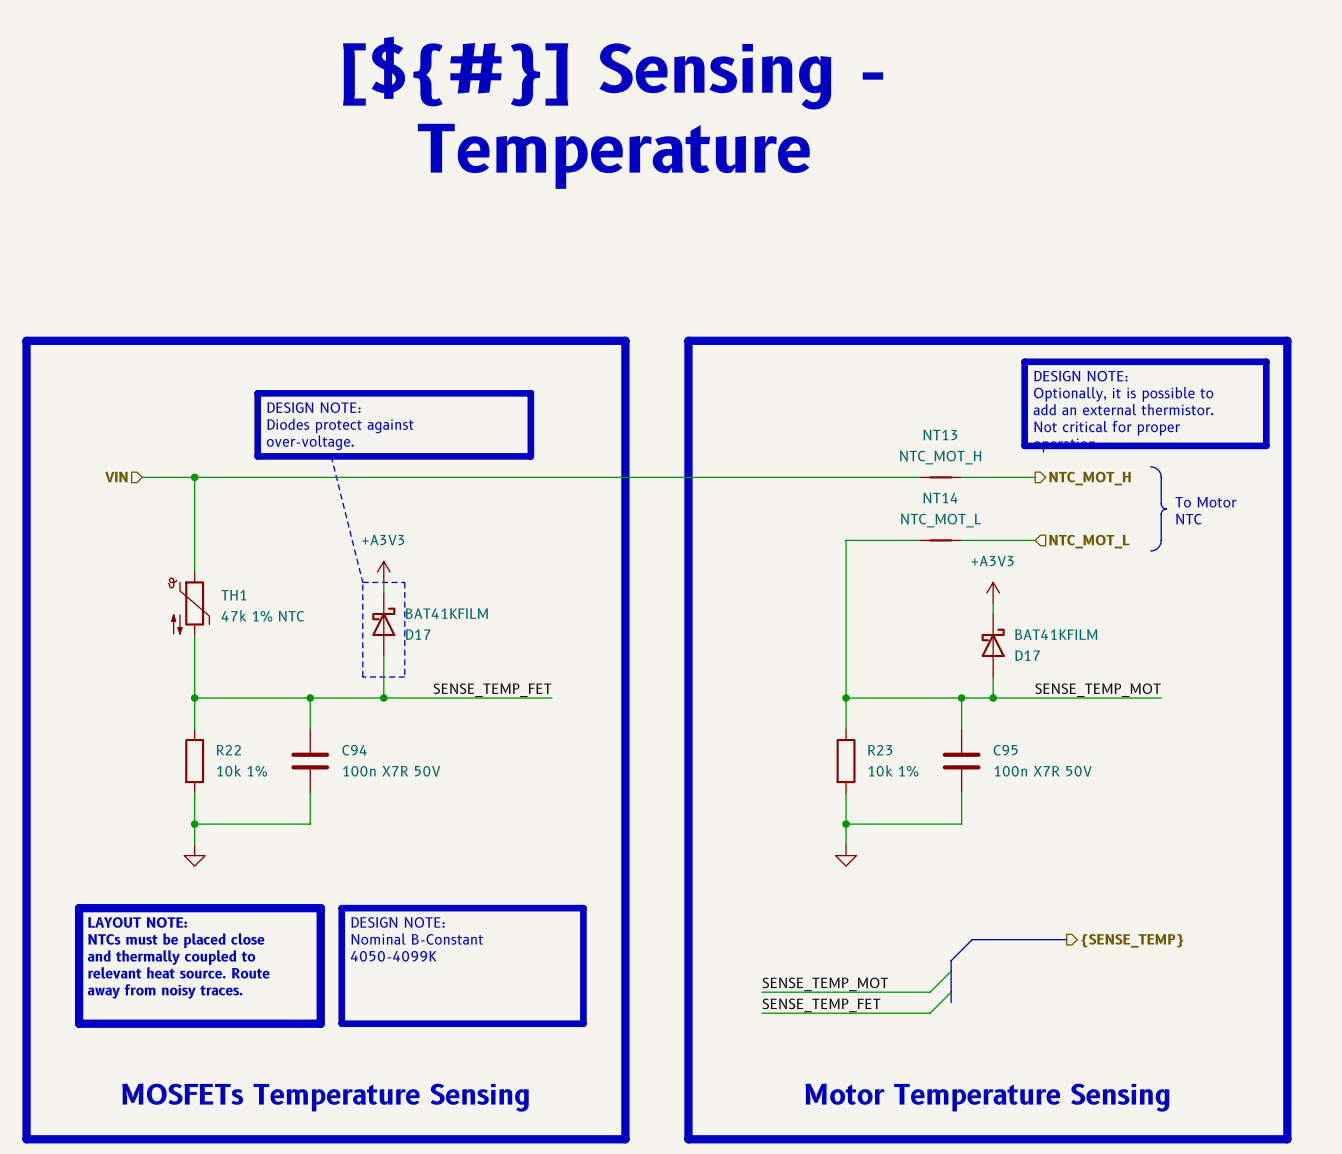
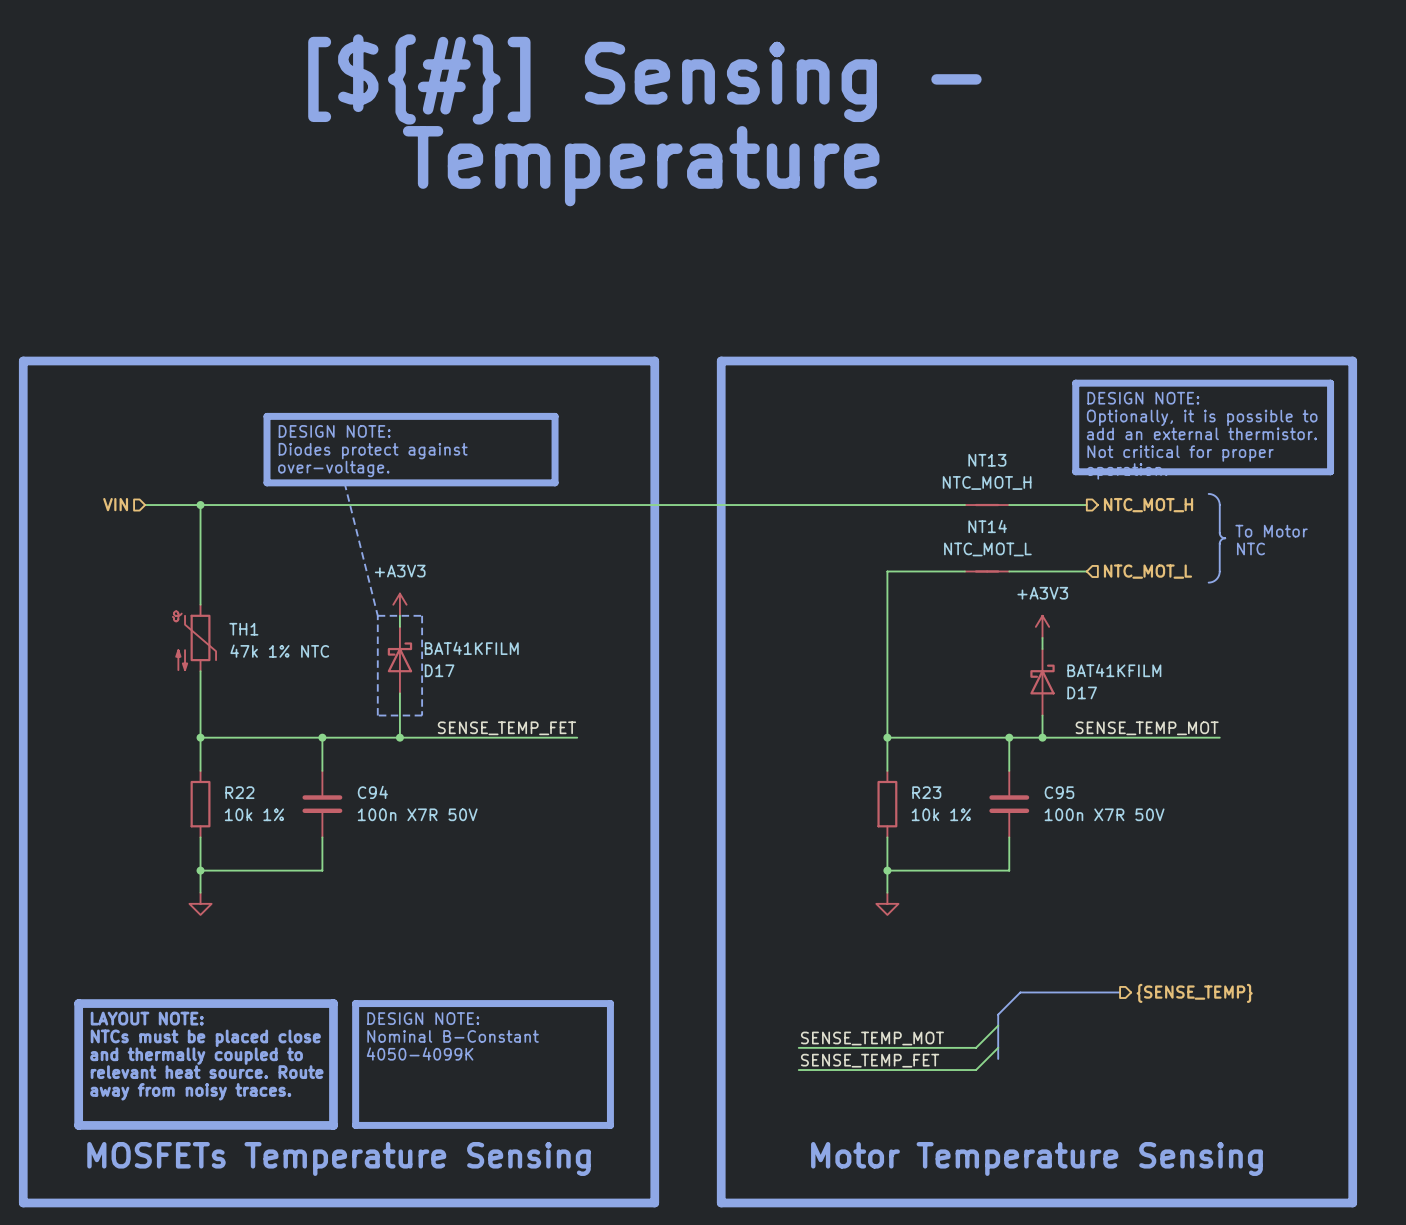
text position: LAYOUT NOTE: (137, 922) -> LAYOUT NOTE: (147, 1018)
text position: DESIGN NOTE: (398, 922) -> DESIGN NOTE: (423, 1018)
text position: Nominal B-Constant (417, 939) -> Nominal B-Constant (453, 1036)
text position: NTCs must be placed close (176, 940) -> NTCs must be placed close (205, 1038)
line: (79, 950) (79, 908) (320, 908) (320, 950) -> (78, 1003) (333, 1003)
line: (341, 950) (341, 908) (583, 908) (583, 950) -> (355, 1003) (610, 1003)
text position: 4050-4099K (393, 956) -> 4050-4099K (420, 1054)
text position: and thermally coupled to (171, 957) -> and thermally coupled to (196, 1056)
text position: relevant heat source. Route (178, 972) -> relevant heat source. Route (207, 1072)
text position: away from noisy traces. (165, 991) -> away from noisy traces. (190, 1091)
line: (79, 1023) (320, 1023) -> (78, 1081) (78, 1125) (333, 1125) (333, 1081)
line: (341, 1023) (583, 1023) -> (355, 1081) (355, 1125) (610, 1125) (610, 1081)

